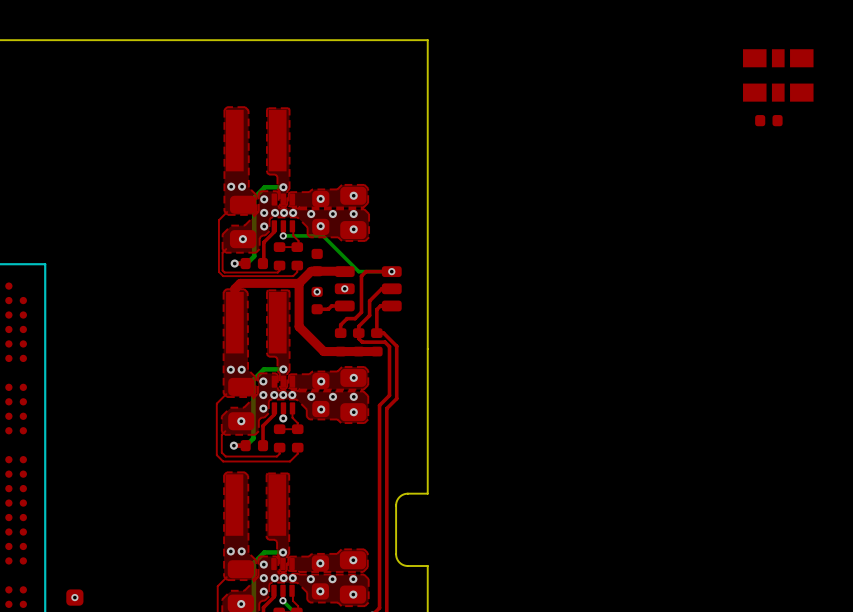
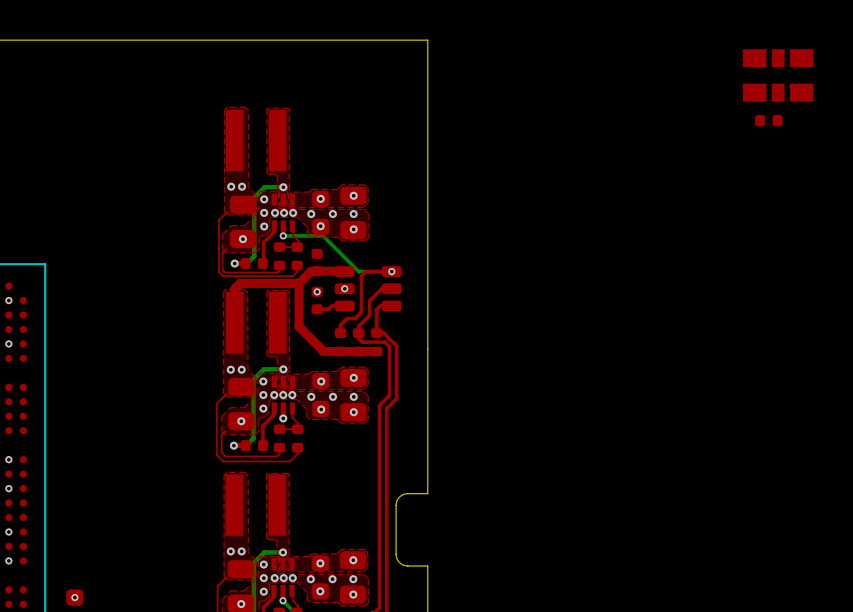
via: none -> (8, 300)
via: none -> (8, 343)
via: none -> (8, 459)
via: none -> (8, 488)
via: none -> (8, 532)
via: none -> (8, 560)

